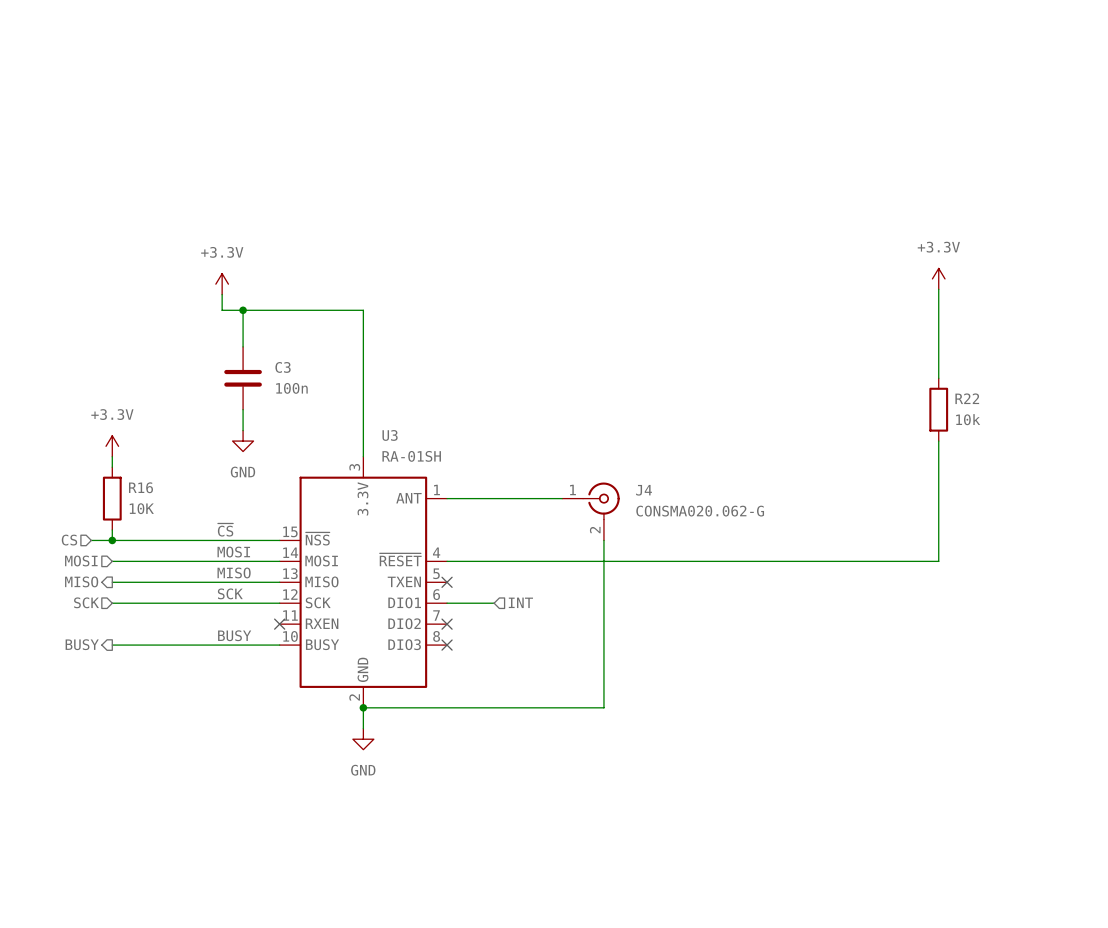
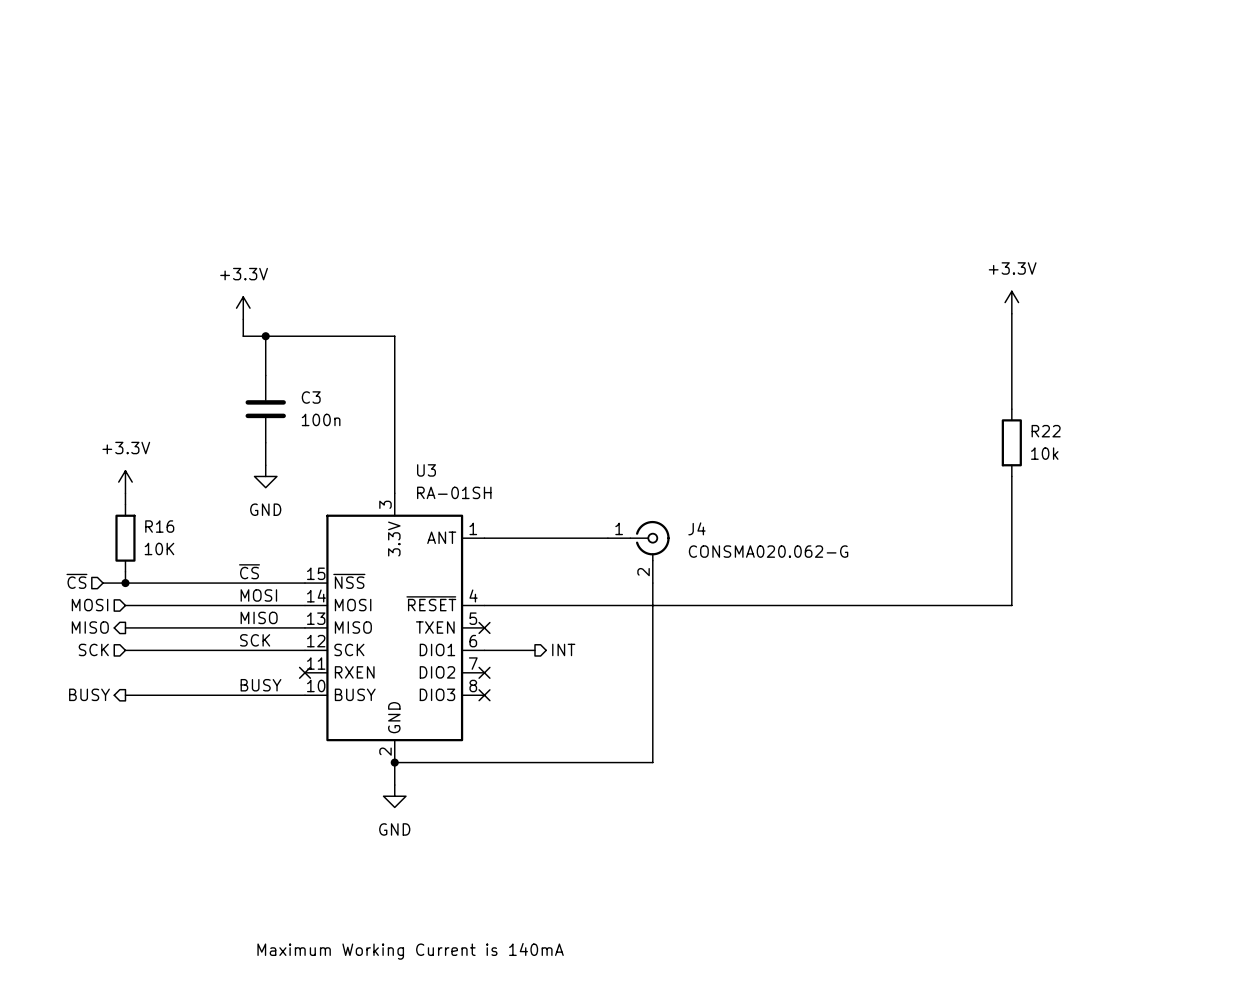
hierarchical label: CS (69, 540) -> ~{CS} (76, 581)
hierarchical label shape: input (520, 602) -> output (563, 649)
text: none -> Maximum Working Current is 140mA (410, 951)

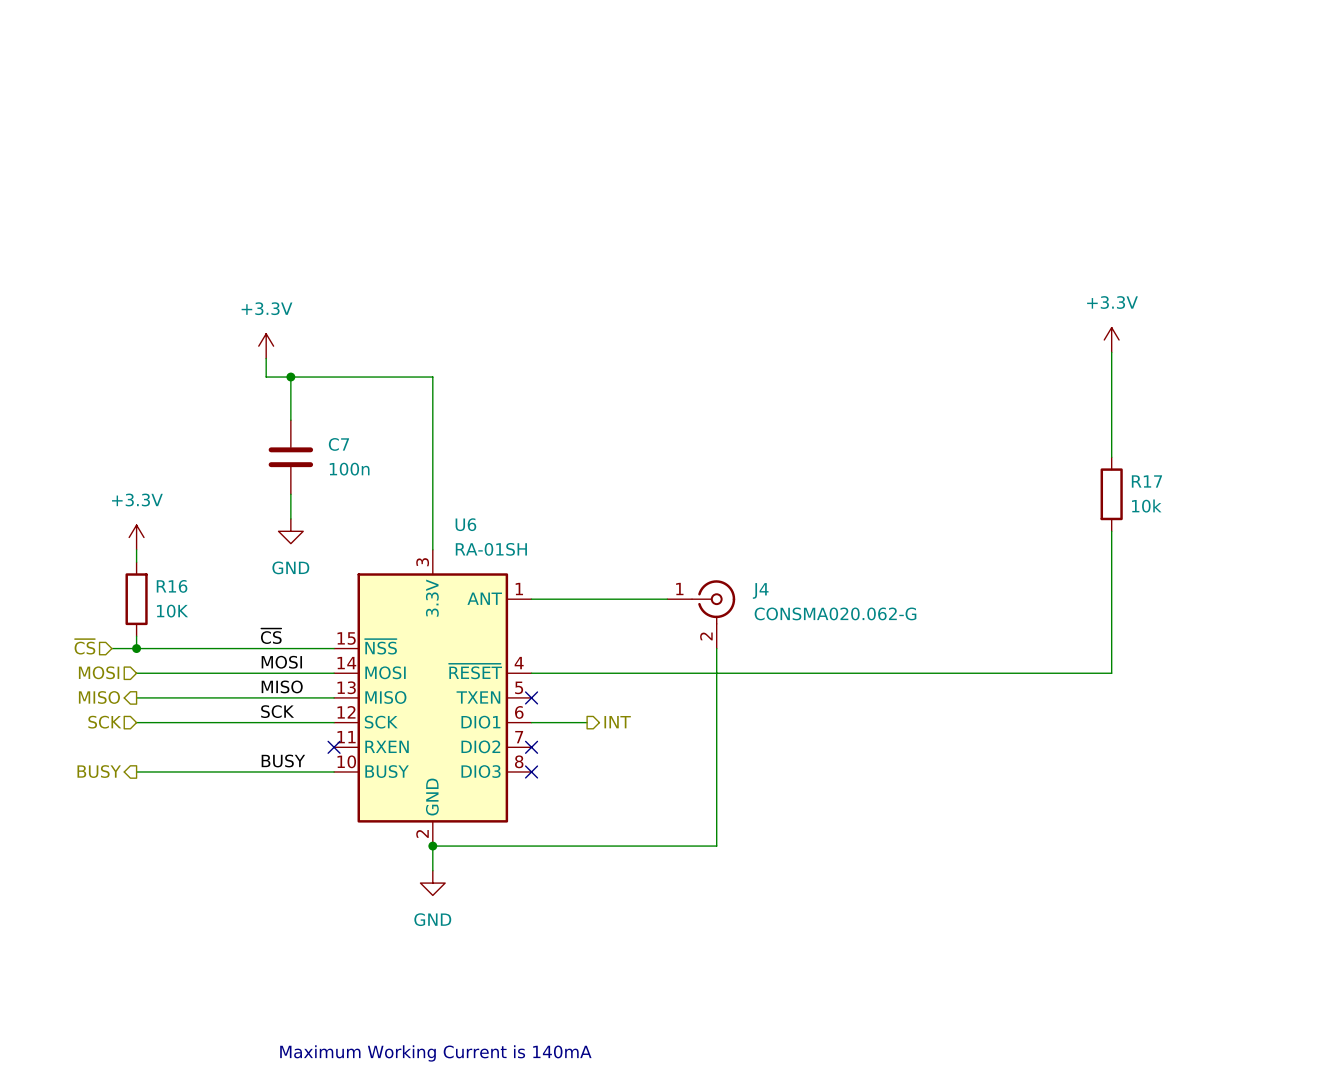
C3 name: C3 (311, 397) -> C7 (338, 444)
R22 name: R22 (1046, 431) -> R17 (1146, 481)
U3 name: U3 (426, 470) -> U6 (465, 524)

